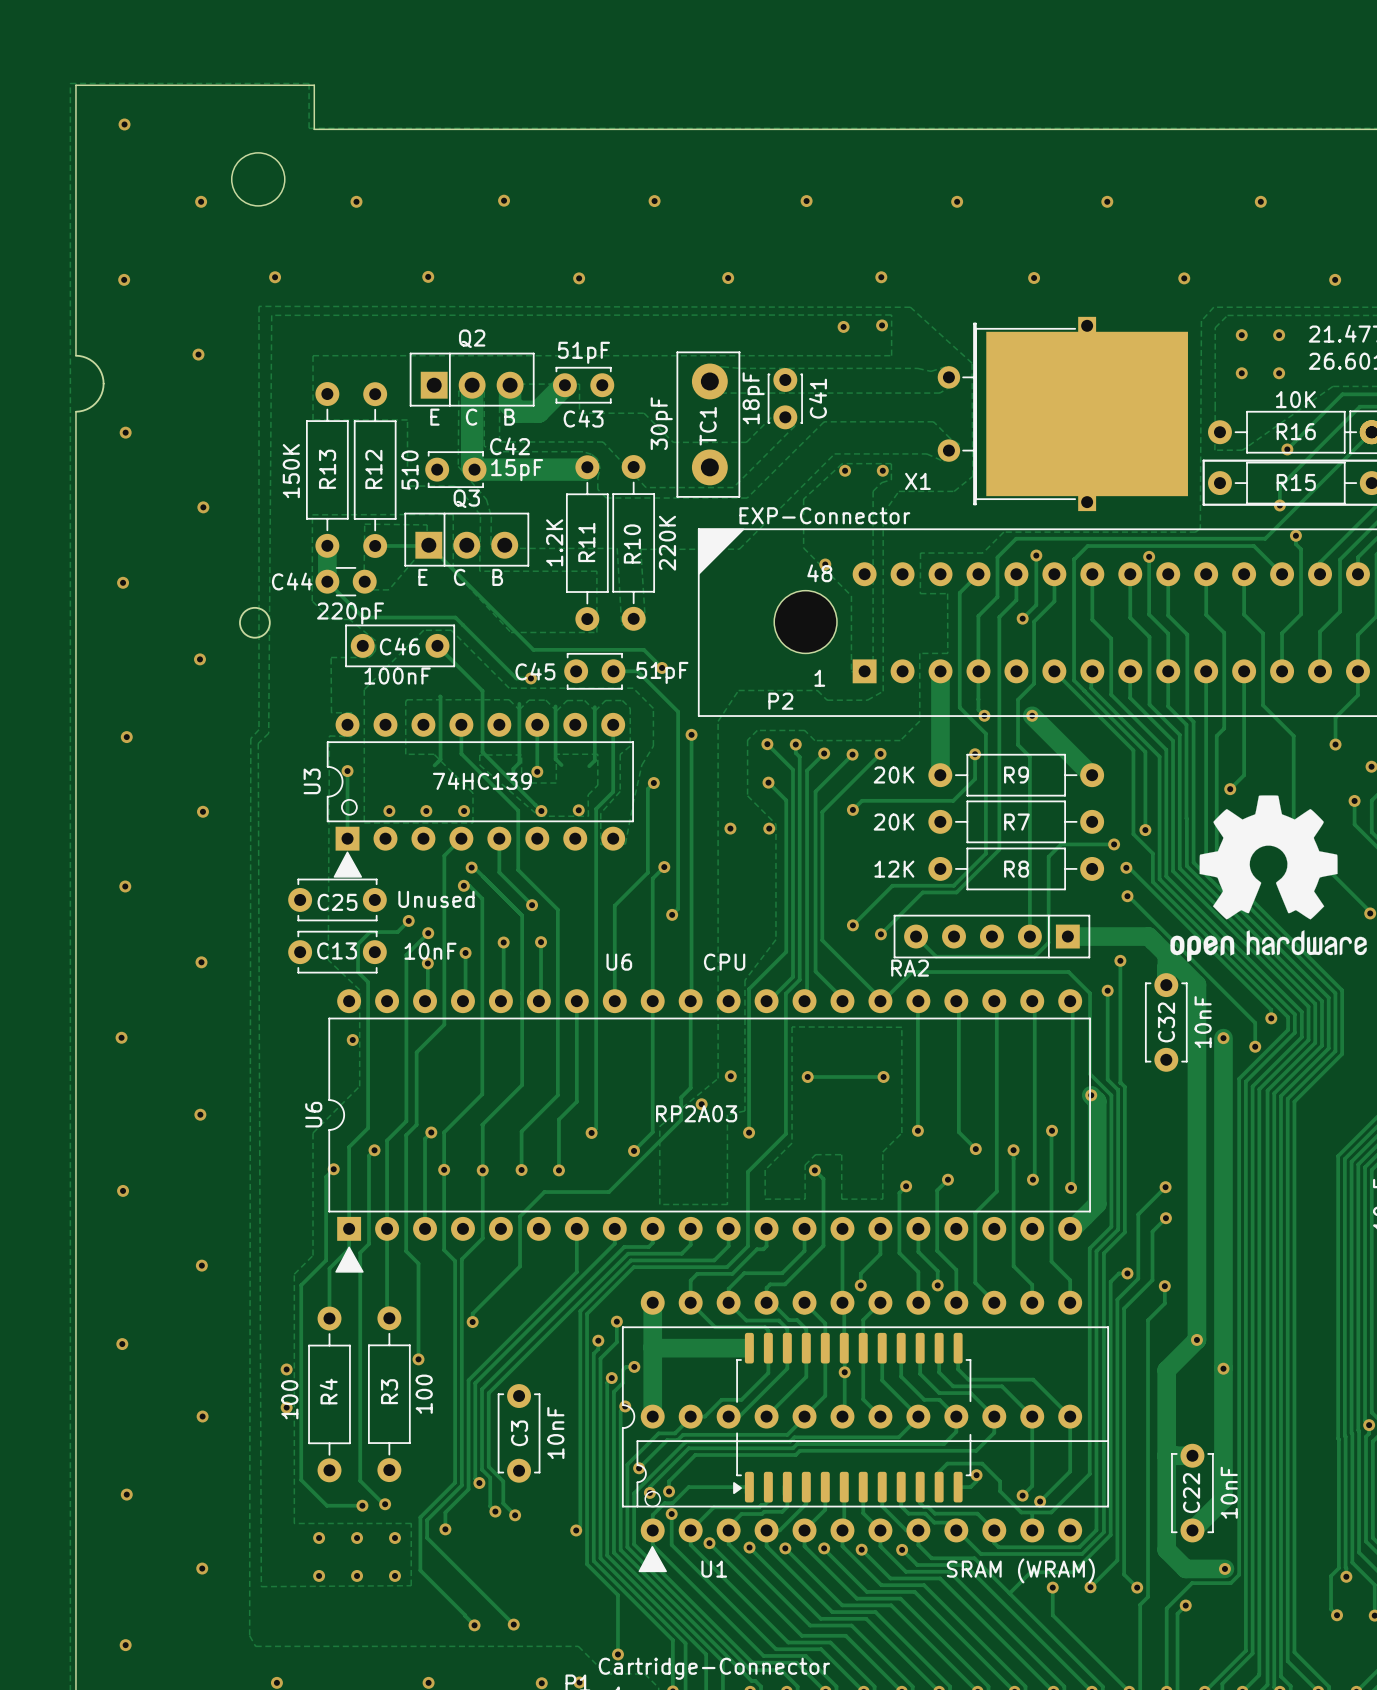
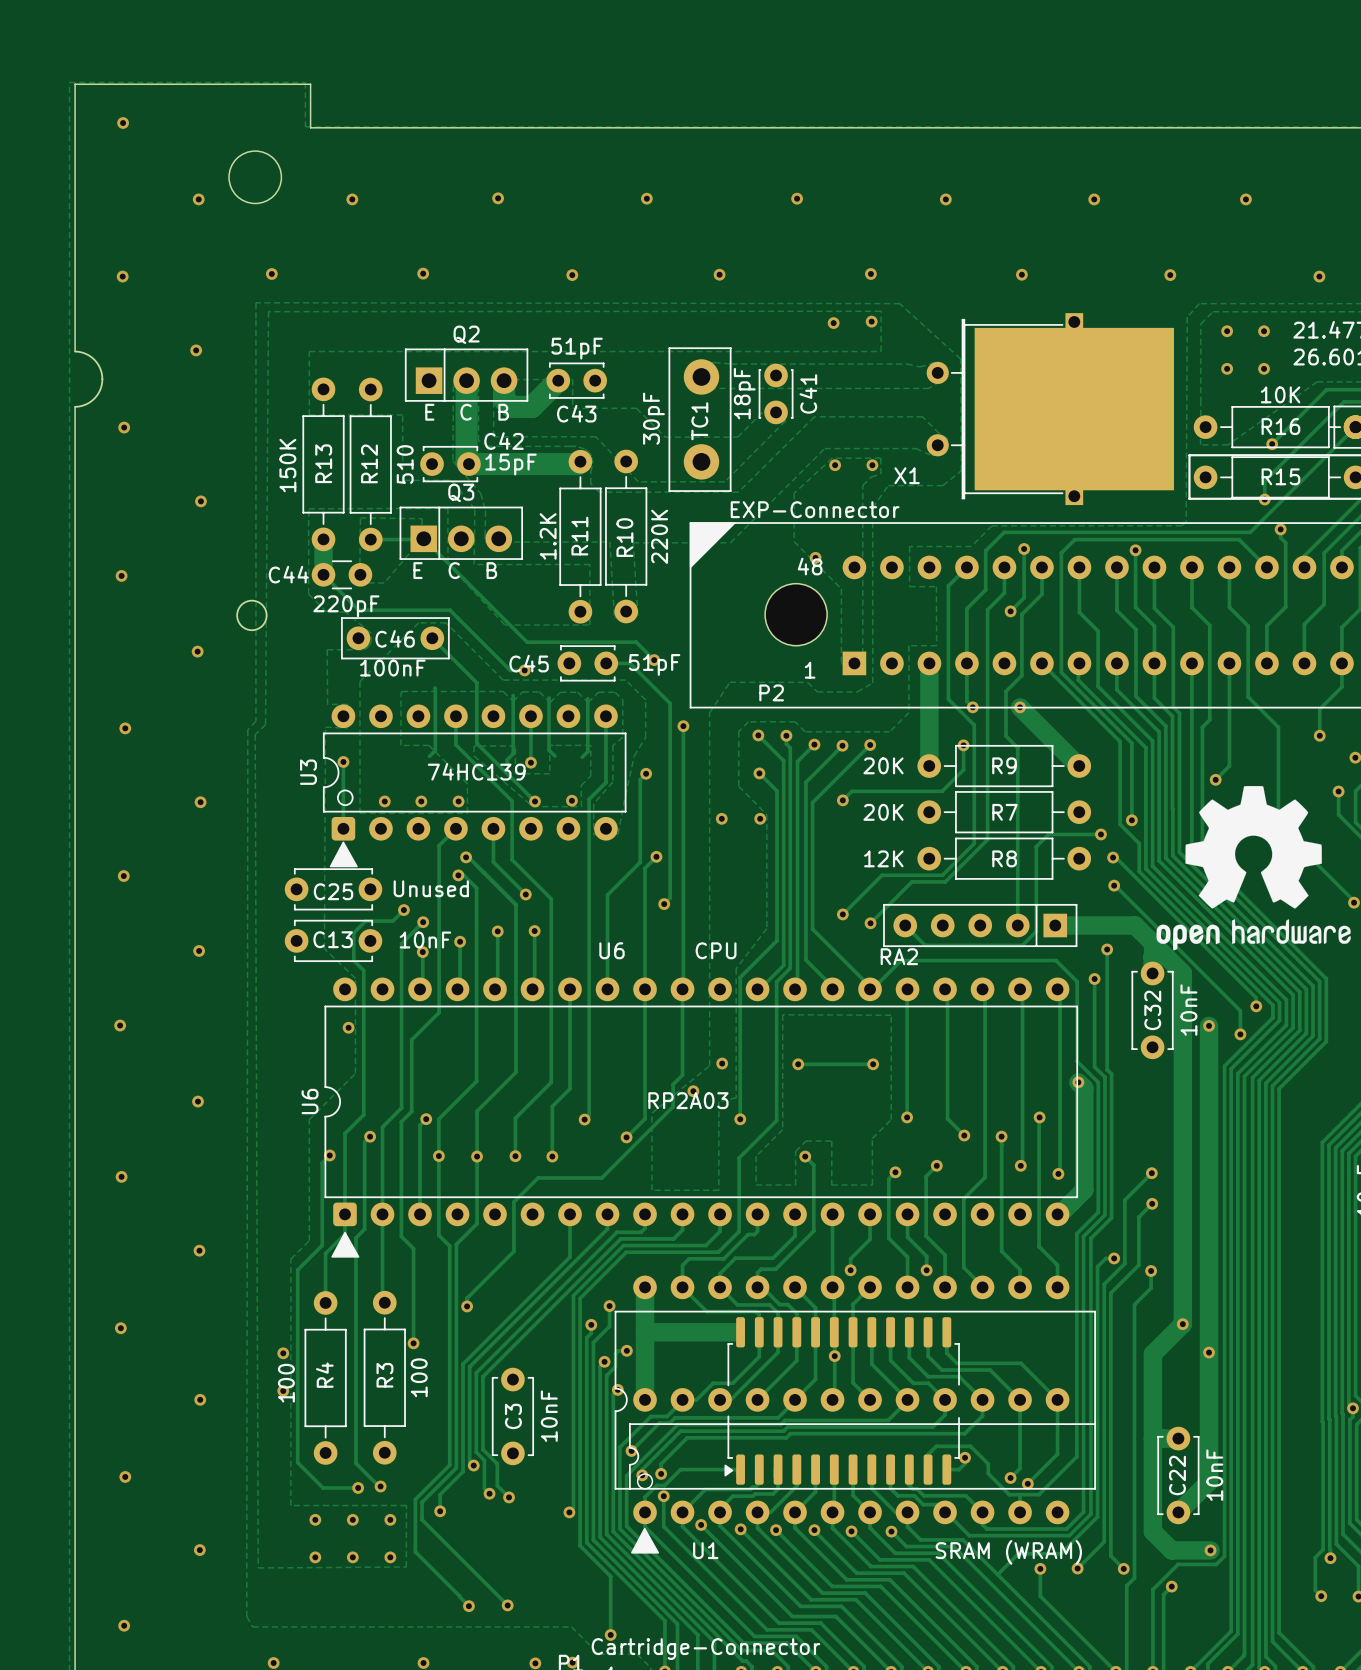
U3 footprint: [326, 712, 634, 851] -> [322, 704, 627, 841]
U6 footprint: [328, 989, 1091, 1241] -> [324, 977, 1079, 1227]

